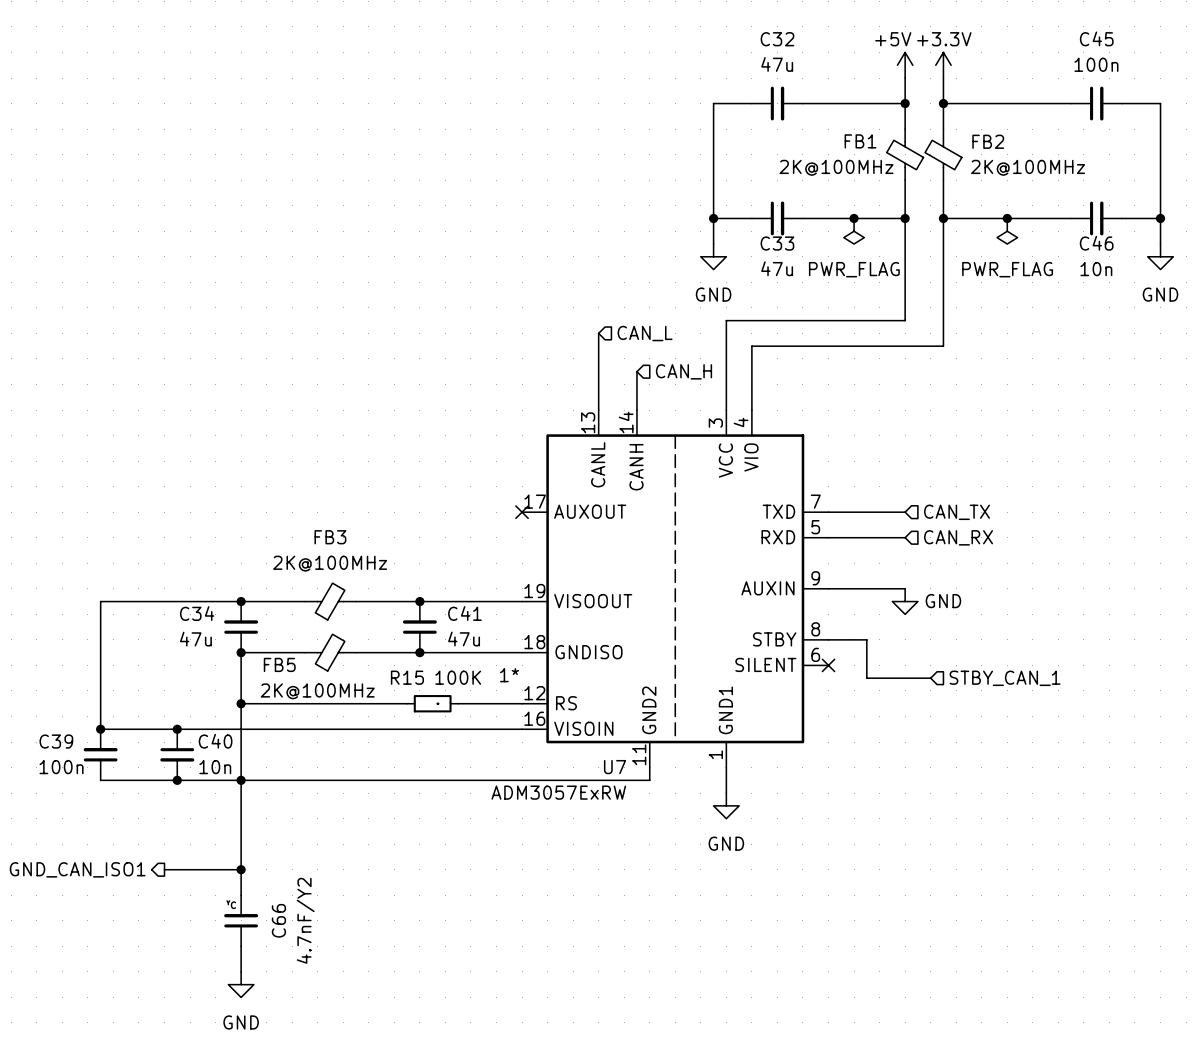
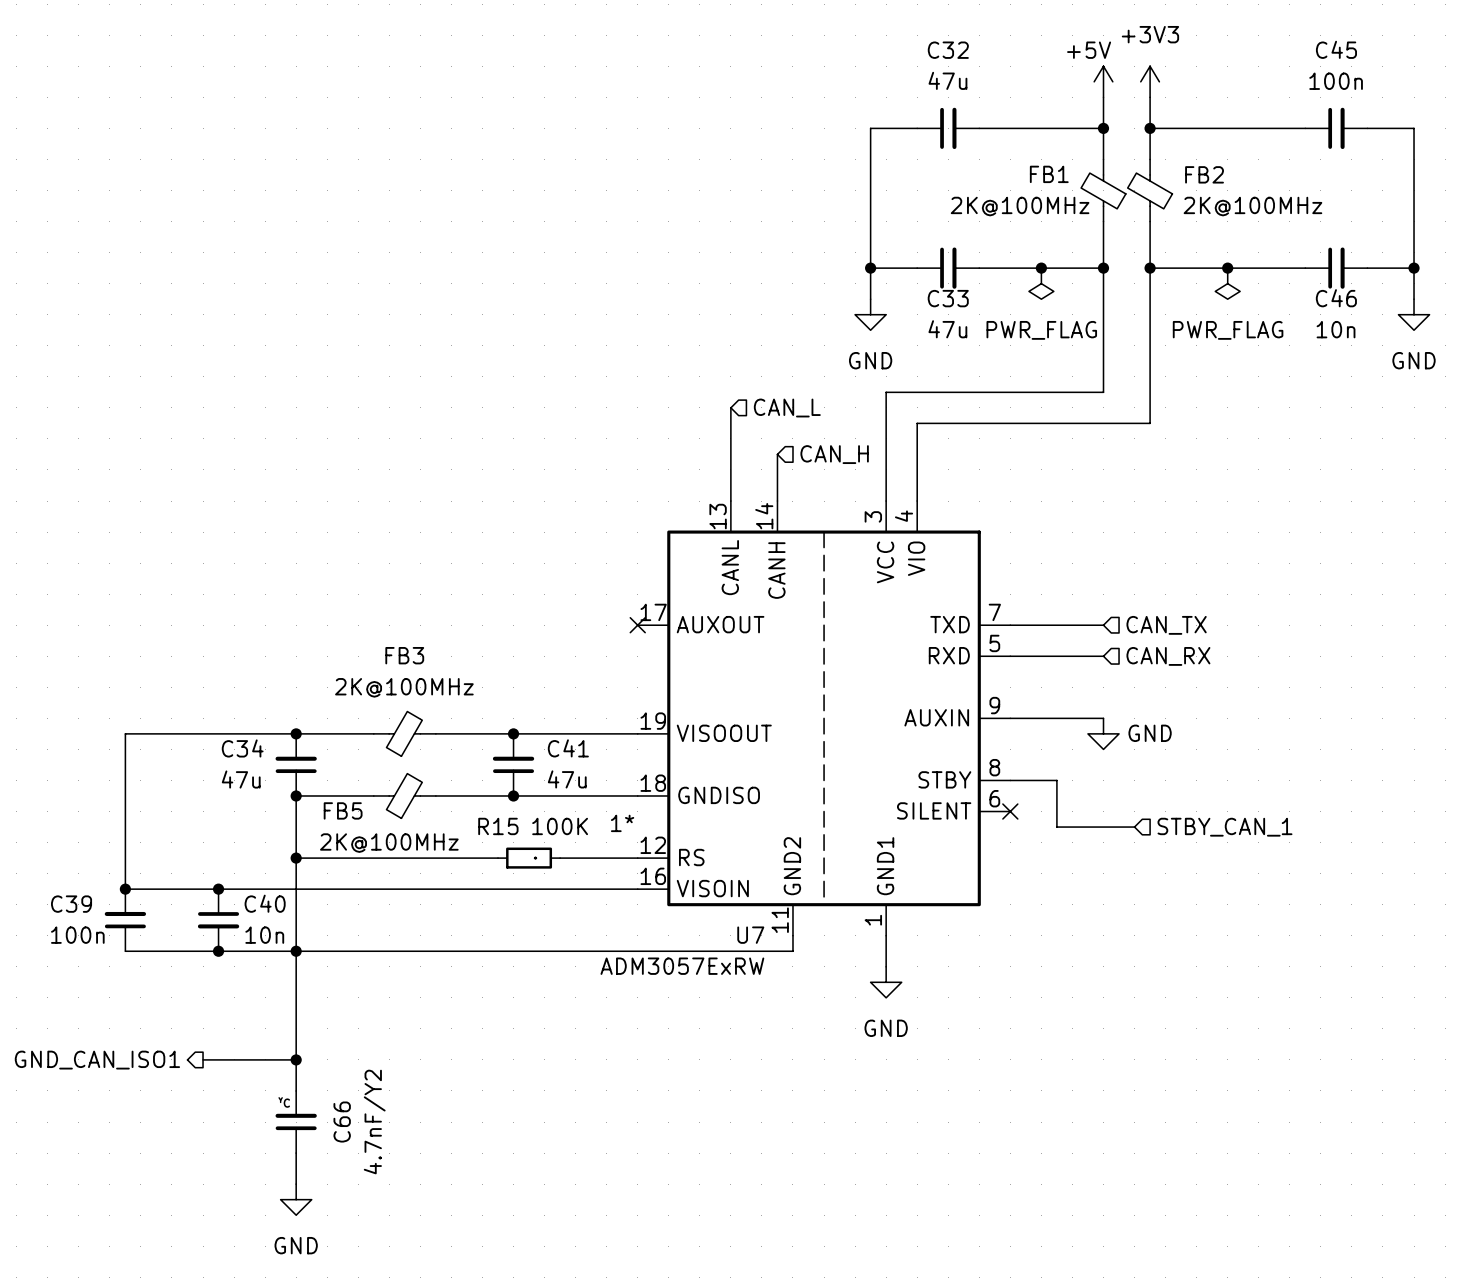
power symbol: +3.3V (943, 65) -> +3V3 (1150, 81)

